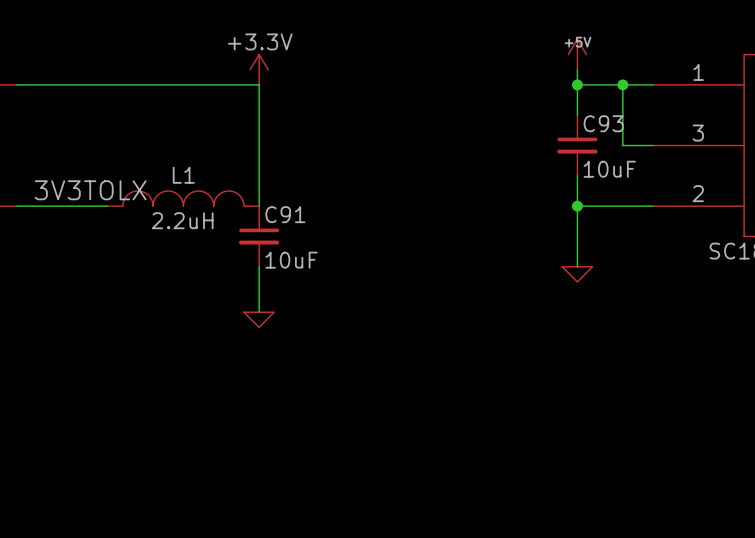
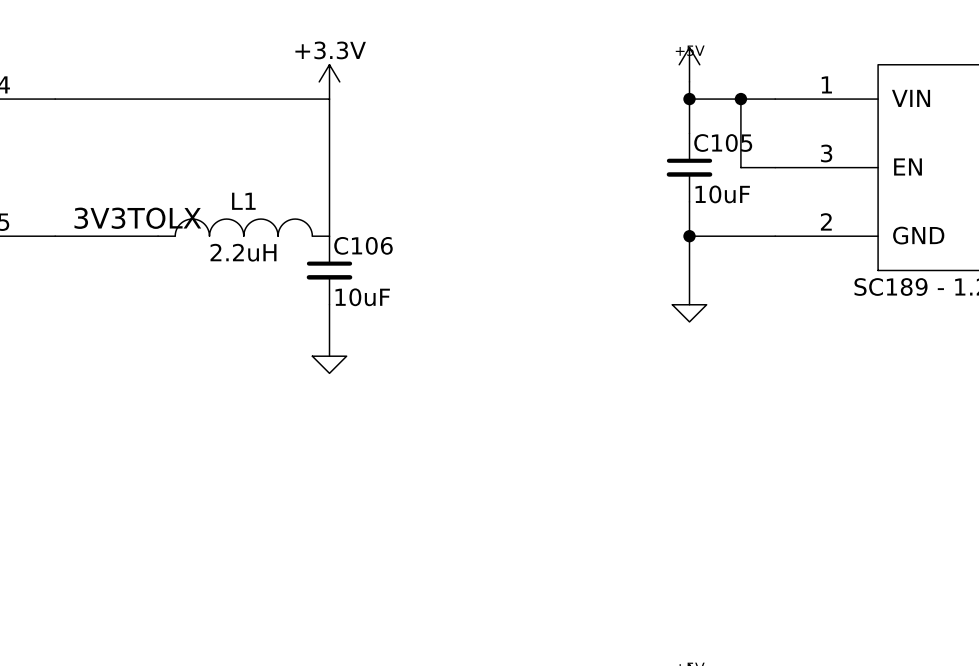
C93 name: C93 (603, 123) -> C105 (723, 143)
C91 name: C91 (285, 214) -> C106 (363, 245)

